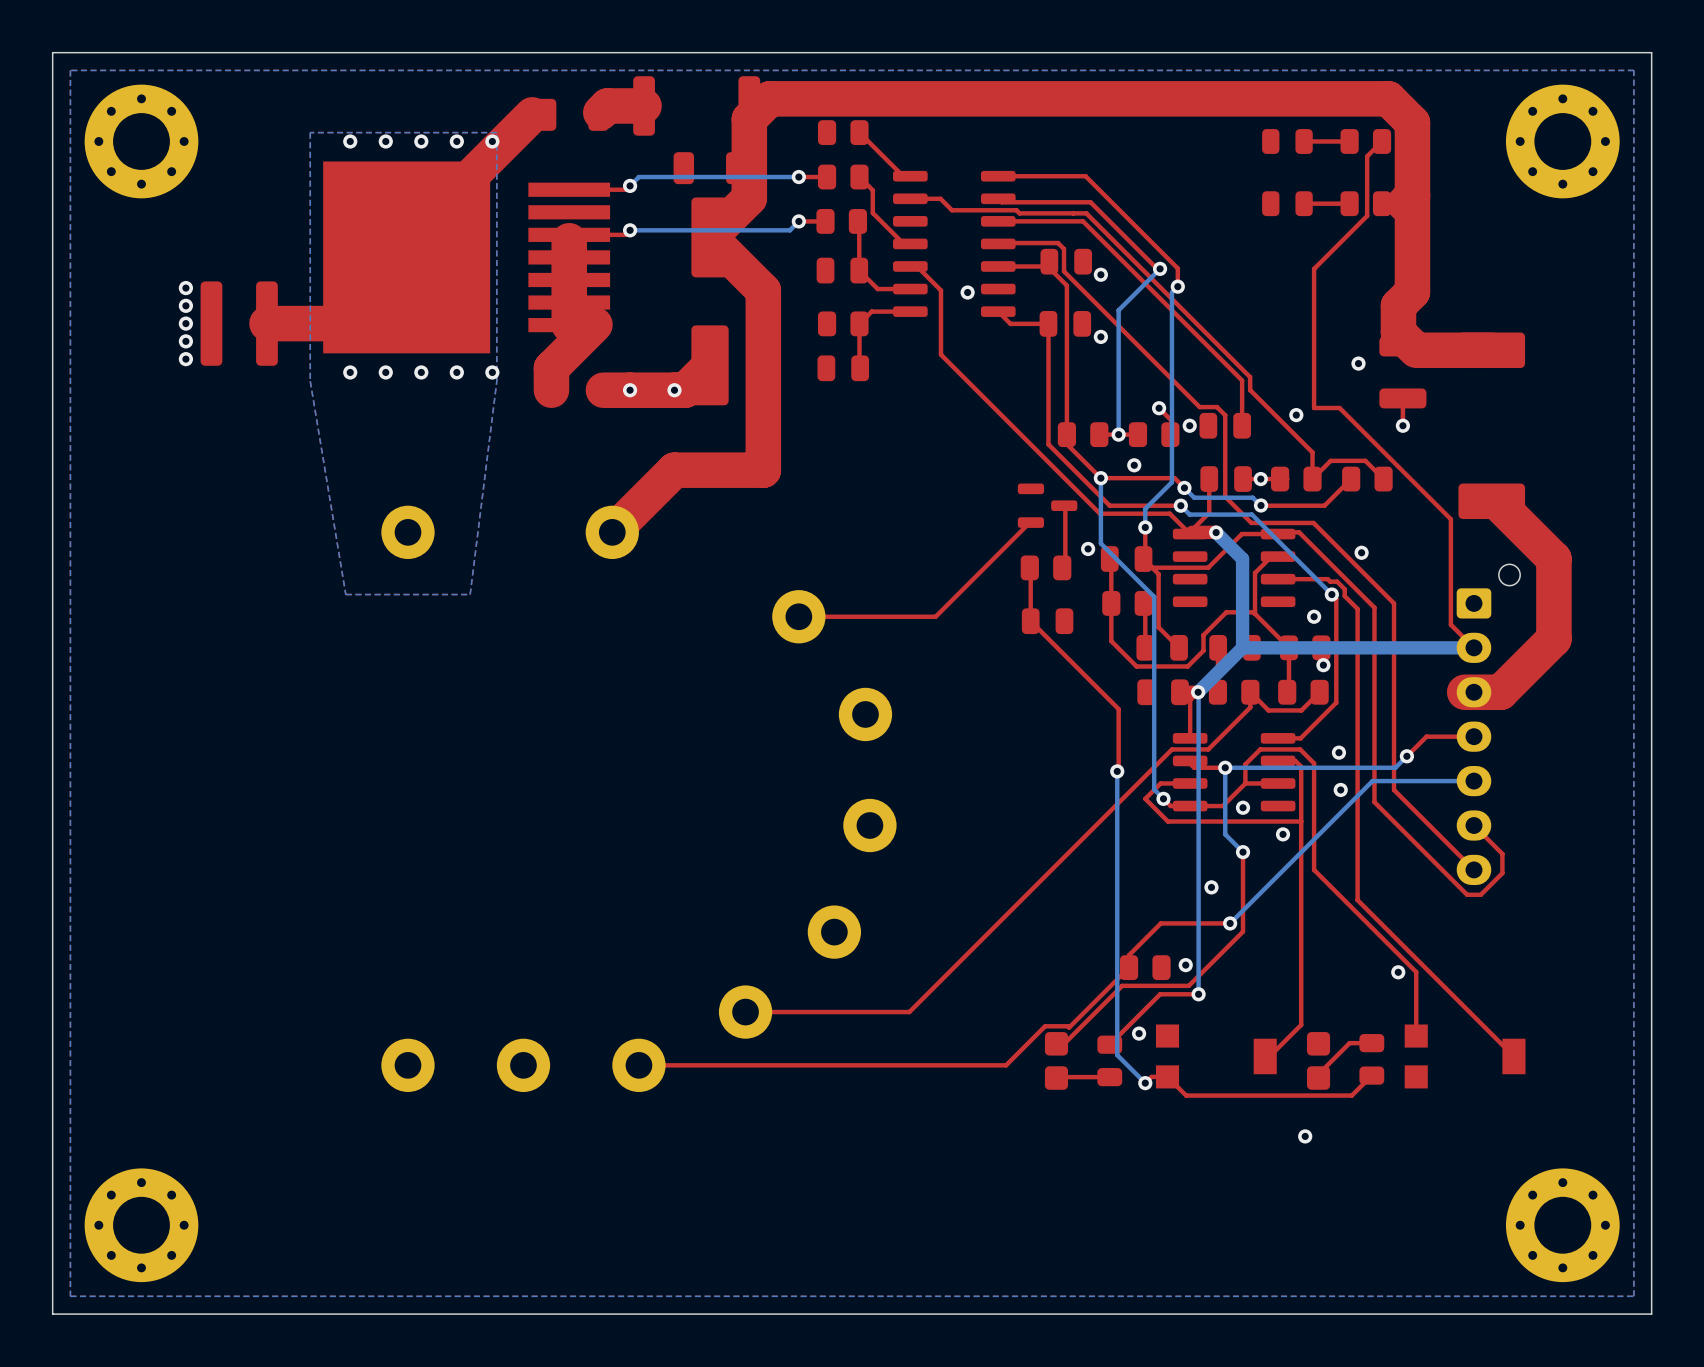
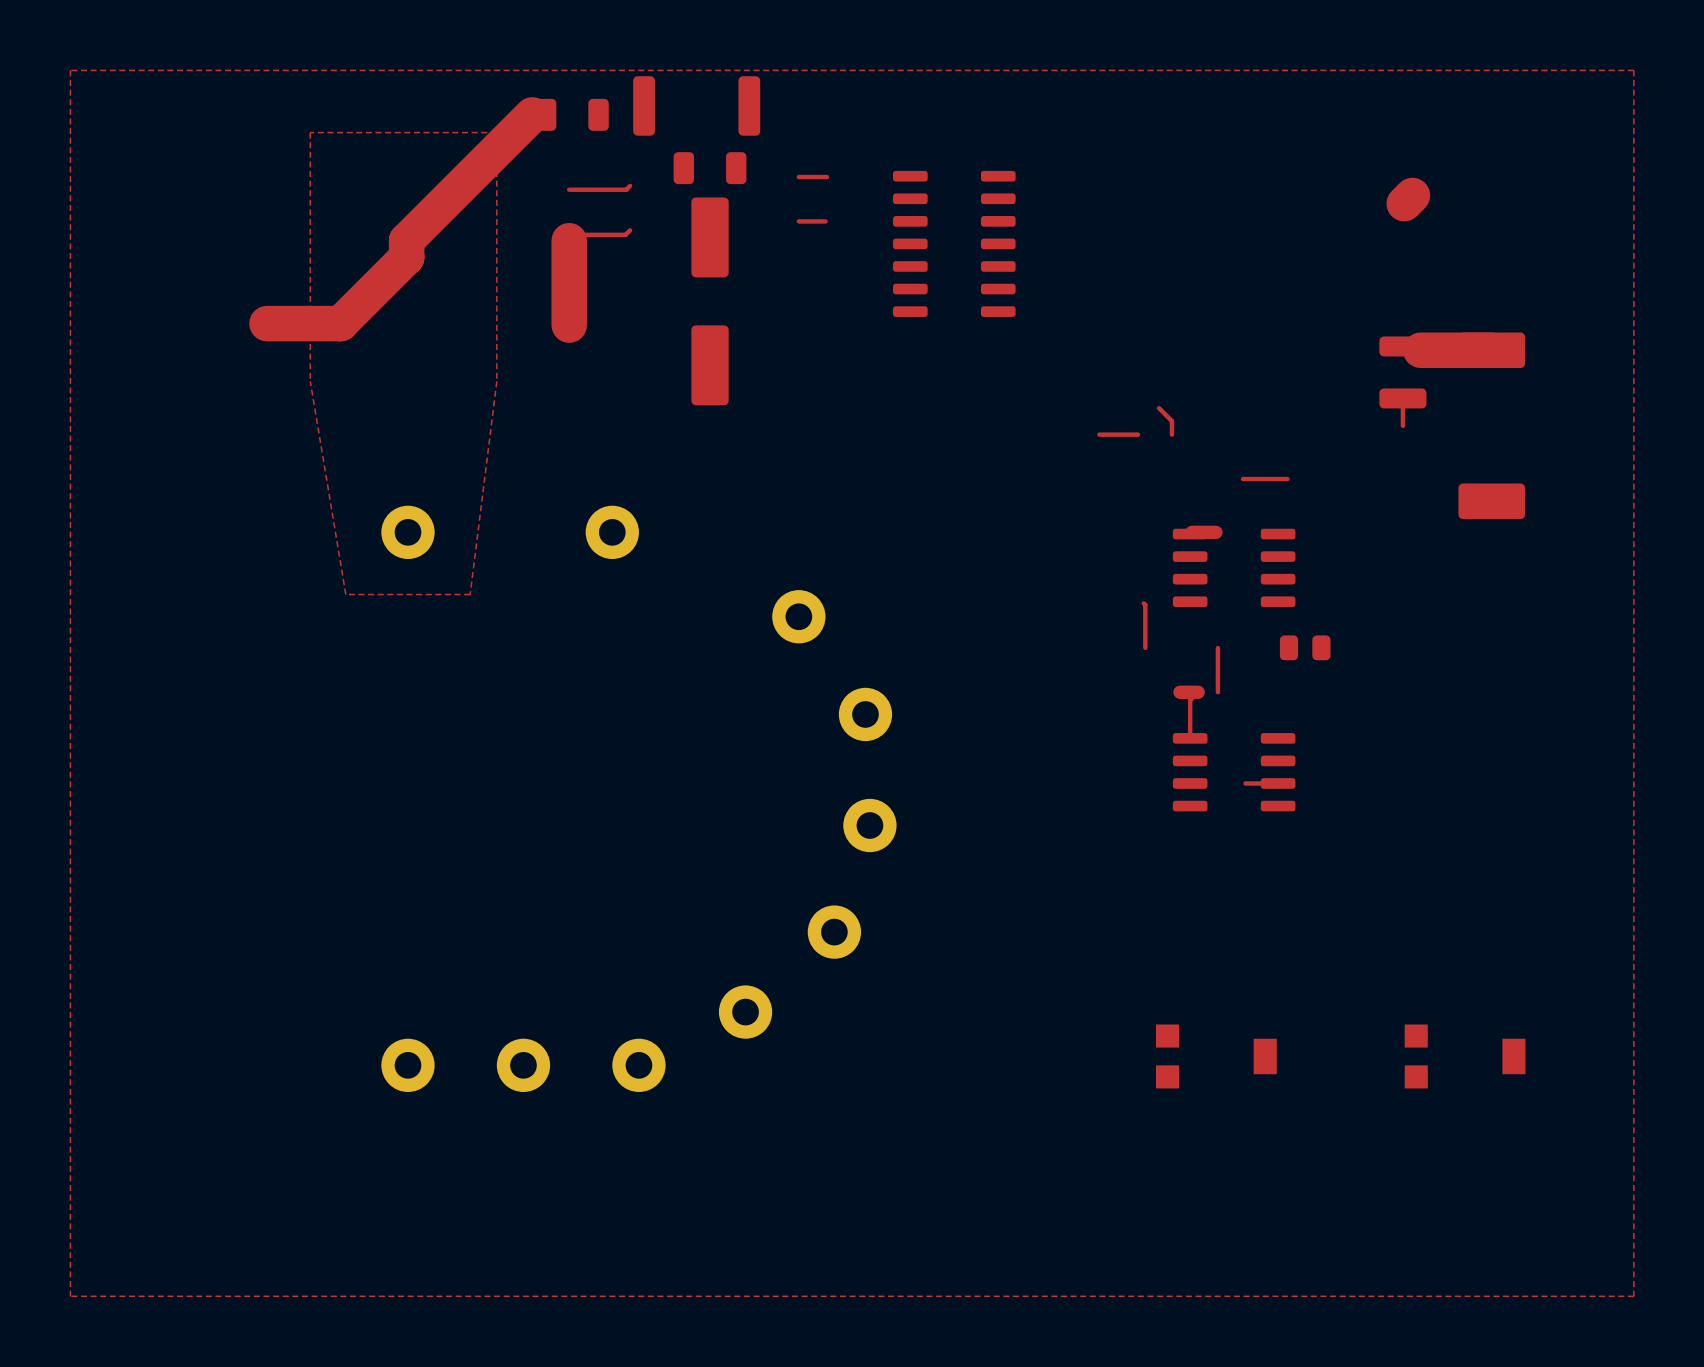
board edge: (1651, 52) (52, 52) (52, 1314) (1651, 1314) (1651, 52) -> none
bottom zone outline: (1633, 70) (1633, 1296) (70, 1296) (70, 70) (1633, 70) -> none
top track: (644, 105) (607, 105) (600, 112) -> none
bottom zone outline: (496, 132) (496, 381) (470, 594) (345, 594) (310, 381) (310, 132) (496, 132) -> none
part: (843, 132) -> none
top track: (859, 132) (903, 176) (910, 176) -> none
part: (141, 141) -> none
via: (350, 141) -> none
via: (385, 141) -> none
via: (421, 141) -> none
via: (456, 141) -> none
via: (492, 141) -> none
part: (1287, 141) -> none
top track: (1349, 141) (1304, 141) -> none
part: (1365, 141) -> none
top track: (1382, 141) (1367, 156) (1367, 215) (1314, 268) (1314, 407) (1339, 407) (1450, 519) (1450, 624) (1473, 647) -> none
part: (1562, 141) -> none
top track: (998, 176) (1085, 176) (1177, 268) (1177, 286) -> none
bottom track: (798, 177) (638, 177) (630, 185) -> none
via: (798, 177) -> none
part: (843, 177) -> none
top track: (859, 177) (872, 190) (872, 213) (903, 243) (910, 243) -> none
via: (630, 185) -> none
top track: (910, 198) (940, 198) (952, 210) (1016, 210) (1019, 213) (1086, 213) (1250, 377) (1250, 390) (1312, 452) (1312, 479) (1330, 460) (1365, 460) (1383, 479) -> none
top track: (998, 198) (1001, 202) (1090, 202) (1157, 268) (1160, 268) -> none
part: (1287, 203) -> none
top track: (1349, 203) (1304, 203) -> none
part: (1365, 203) -> none
bottom track: (798, 221) (789, 230) (630, 230) -> none
via: (798, 221) -> none
part: (841, 221) -> none
top track: (857, 221) (859, 270) (877, 289) (910, 289) -> none
top track: (998, 221) (1083, 221) (1242, 380) (1242, 425) -> none
via: (630, 230) -> none
top track: (998, 243) (1058, 243) (1064, 249) (1064, 271) (1199, 407) (1217, 407) (1225, 415) (1225, 496) (1251, 522) (1313, 522) (1394, 603) (1394, 789) (1473, 869) -> none
part: (466, 257) -> none
part: (1066, 261) -> none
top track: (910, 266) (917, 266) (940, 290) (940, 354) (1099, 513) (1169, 513) (1190, 534) -> none
top track: (998, 266) (1044, 266) (1049, 261) (1049, 268) (1066, 285) (1066, 444) (1100, 478) (1174, 478) (1184, 487) -> none
bottom track: (1160, 268) (1118, 310) (1118, 434) -> none
via: (1160, 268) -> none
part: (842, 270) -> none
via: (1100, 274) -> none
bottom track: (1177, 286) (1171, 292) (1171, 482) (1145, 508) (1145, 527) -> none
via: (1177, 286) -> none
via: (185, 288) -> none
via: (967, 292) -> none
via: (185, 305) -> none
top track: (910, 311) (871, 311) (859, 323) (860, 368) -> none
top track: (998, 311) (1010, 323) (1048, 323) (1048, 444) (1109, 505) (1180, 505) -> none
via: (185, 323) -> none
part: (239, 323) -> none
part: (843, 323) -> none
part: (1065, 323) -> none
top track: (594, 324) (551, 368) (551, 390) -> none
via: (1100, 336) -> none
via: (185, 341) -> none
top track: (1416, 350) (1398, 332) (1398, 305) (1412, 291) (1412, 122) (1388, 98) (769, 98) (749, 119) (749, 198) (710, 237) (763, 290) (763, 470) (674, 470) (612, 532) -> none
via: (185, 359) -> none
via: (1358, 363) -> none
top track: (710, 365) (685, 390) (603, 390) -> none
part: (843, 368) -> none
via: (350, 372) -> none
via: (385, 372) -> none
via: (421, 372) -> none
via: (456, 372) -> none
via: (492, 372) -> none
via: (630, 390) -> none
via: (674, 390) -> none
via: (1159, 408) -> none
via: (1296, 415) -> none
via: (1189, 425) -> none
part: (1225, 425) -> none
via: (1402, 425) -> none
part: (1083, 434) -> none
via: (1118, 434) -> none
part: (1154, 434) -> none
via: (1134, 465) -> none
bottom track: (1100, 478) (1100, 543) (1154, 596) (1154, 789) (1163, 798) -> none
via: (1100, 478) -> none
top track: (1209, 479) (1209, 512) (1189, 532) -> none
part: (1226, 479) -> none
via: (1260, 479) -> none
part: (1296, 479) -> none
top track: (1351, 479) (1324, 505) (1261, 505) -> none
part: (1367, 479) -> none
bottom track: (1184, 487) (1194, 497) (1252, 497) (1260, 505) -> none
via: (1184, 487) -> none
part: (1047, 505) -> none
top track: (1065, 505) (1065, 564) (1062, 567) -> none
bottom track: (1180, 505) (1189, 514) (1251, 514) (1331, 594) -> none
via: (1180, 505) -> none
via: (1261, 505) -> none
top track: (1500, 505) (1553, 559) (1553, 638) (1500, 692) (1464, 692) -> none
top track: (1029, 522) (935, 616) (798, 616) -> none
top track: (1145, 527) (1145, 557) (1143, 559) (1158, 574) (1158, 627) (1179, 647) -> none
via: (1145, 527) -> none
bottom track: (1216, 532) (1242, 559) (1242, 647) -> none
via: (1216, 532) -> none
top track: (1278, 532) (1299, 532) (1374, 607) (1374, 802) (1467, 894) (1480, 894) (1502, 873) (1502, 853) (1473, 825) -> none
top track: (1278, 534) (1241, 534) (1208, 567) (1152, 567) -> none
via: (1088, 548) -> none
via: (1361, 552) -> none
top track: (1278, 556) (1271, 556) (1255, 573) (1255, 613) -> none
top track: (1109, 559) (1111, 560) (1111, 641) (1136, 666) (1187, 666) (1203, 650) (1203, 635) (1226, 612) (1253, 612) (1288, 647) -> none
part: (1126, 559) -> none
top track: (1029, 567) (1030, 621) (1118, 709) (1117, 771) -> none
part: (1046, 567) -> none
top track: (1278, 579) (1327, 579) (1330, 581) (1337, 581) (1344, 589) (1344, 596) (1357, 609) (1357, 900) (1513, 1056) -> none
top track: (1331, 594) (1336, 598) (1336, 702) (1300, 738) (1278, 738) -> none
via: (1331, 594) -> none
part: (1127, 603) -> none
via: (1314, 616) -> none
part: (1047, 621) -> none
part: (1162, 647) -> none
part: (1235, 647) -> none
bottom track: (1242, 647) (1198, 692) (1198, 994) -> none
top track: (1288, 647) (1288, 690) (1287, 692) -> none
bottom track: (1473, 647) (1242, 647) -> none
via: (1323, 665) -> none
part: (1163, 692) -> none
via: (1198, 692) -> none
part: (1234, 692) -> none
part: (1303, 692) -> none
top track: (1319, 692) (1301, 710) (1268, 710) (1250, 692) (1250, 707) (1208, 749) (1172, 749) (909, 1012) (745, 1012) -> none
part: (1488, 724) -> none
top track: (1473, 736) (1426, 736) (1406, 756) -> none
via: (1338, 752) -> none
bottom track: (1406, 756) (1395, 767) (1225, 767) (1225, 834) (1243, 852) -> none
via: (1406, 756) -> none
top track: (1278, 760) (1295, 760) (1301, 766) (1301, 1024) (1269, 1056) (1265, 1056) -> none
top track: (1189, 763) (1194, 767) (1225, 767) -> none
via: (1225, 767) -> none
bottom track: (1117, 771) (1117, 1055) (1145, 1083) -> none
via: (1117, 771) -> none
bottom track: (1473, 781) (1372, 781) (1230, 923) -> none
top track: (1190, 783) (1160, 783) (1145, 798) (1167, 821) (1301, 821) -> none
via: (1340, 789) -> none
top track: (1163, 798) (1170, 806) (1222, 806) (1245, 783) (1245, 764) (1260, 749) (1300, 749) (1314, 763) (1314, 869) (1416, 972) (1416, 1036) -> none
via: (1163, 798) -> none
via: (1243, 807) -> none
via: (1282, 834) -> none
top track: (1243, 852) (1243, 931) (1188, 985) (1122, 985) (1064, 1043) (1056, 1043) -> none
via: (1243, 852) -> none
via: (1211, 887) -> none
top track: (1230, 923) (1160, 923) (1129, 955) (1129, 967) (1069, 1027) (1045, 1026) (1006, 1065) (630, 1065) -> none
via: (1230, 923) -> none
via: (1185, 965) -> none
part: (1145, 967) -> none
via: (1398, 972) -> none
top track: (1198, 994) (1160, 994) (1109, 1044) -> none
via: (1198, 994) -> none
via: (1139, 1033) -> none
top track: (1371, 1043) (1349, 1043) (1314, 1078) -> none
part: (1371, 1059) -> none
part: (1056, 1060) -> none
part: (1109, 1060) -> none
part: (1318, 1060) -> none
top track: (1371, 1075) (1351, 1095) (1186, 1095) (1167, 1076) (1151, 1076) (1145, 1083) -> none
top track: (1109, 1077) (1058, 1077) -> none
via: (1145, 1083) -> none
via: (1305, 1136) -> none
part: (141, 1225) -> none
part: (1562, 1225) -> none

